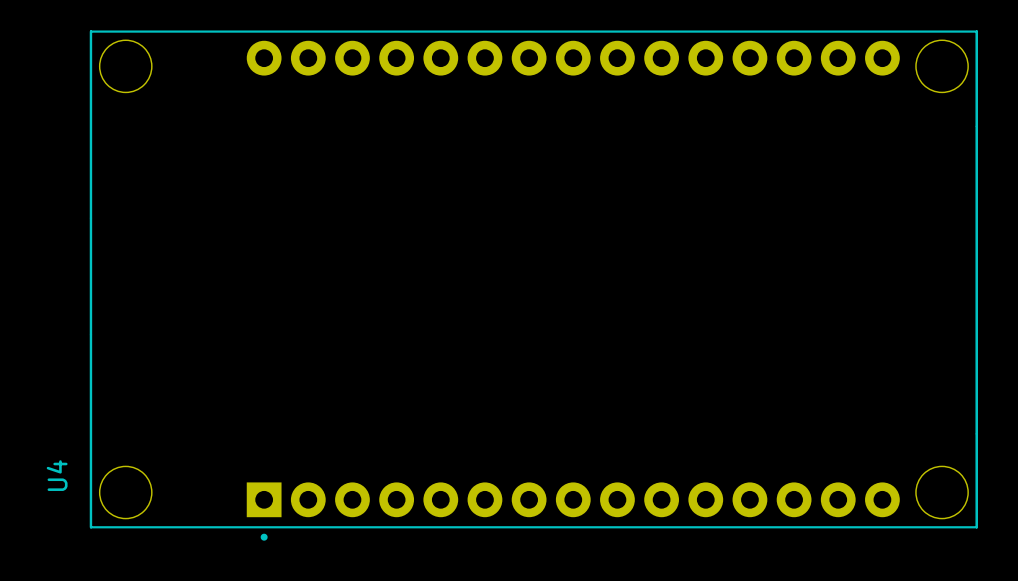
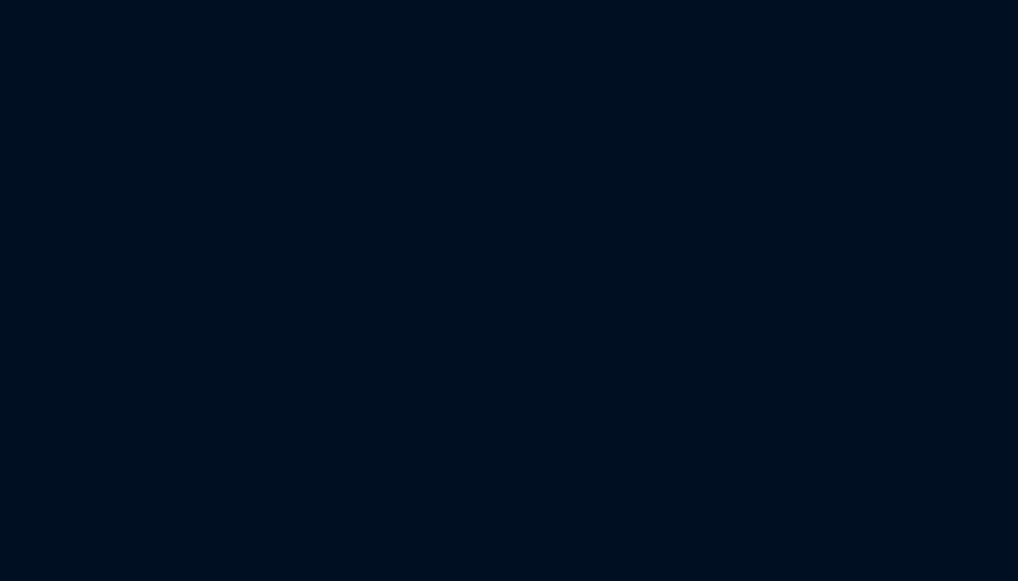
U4: (533, 285) -> none

